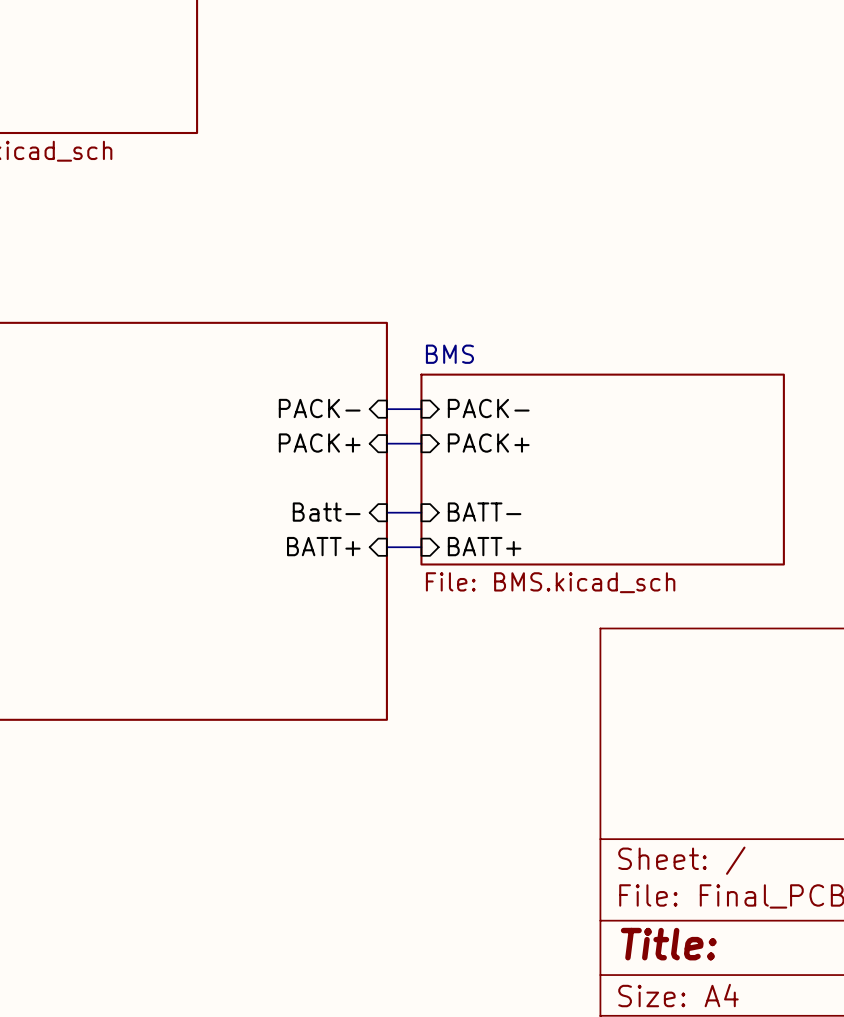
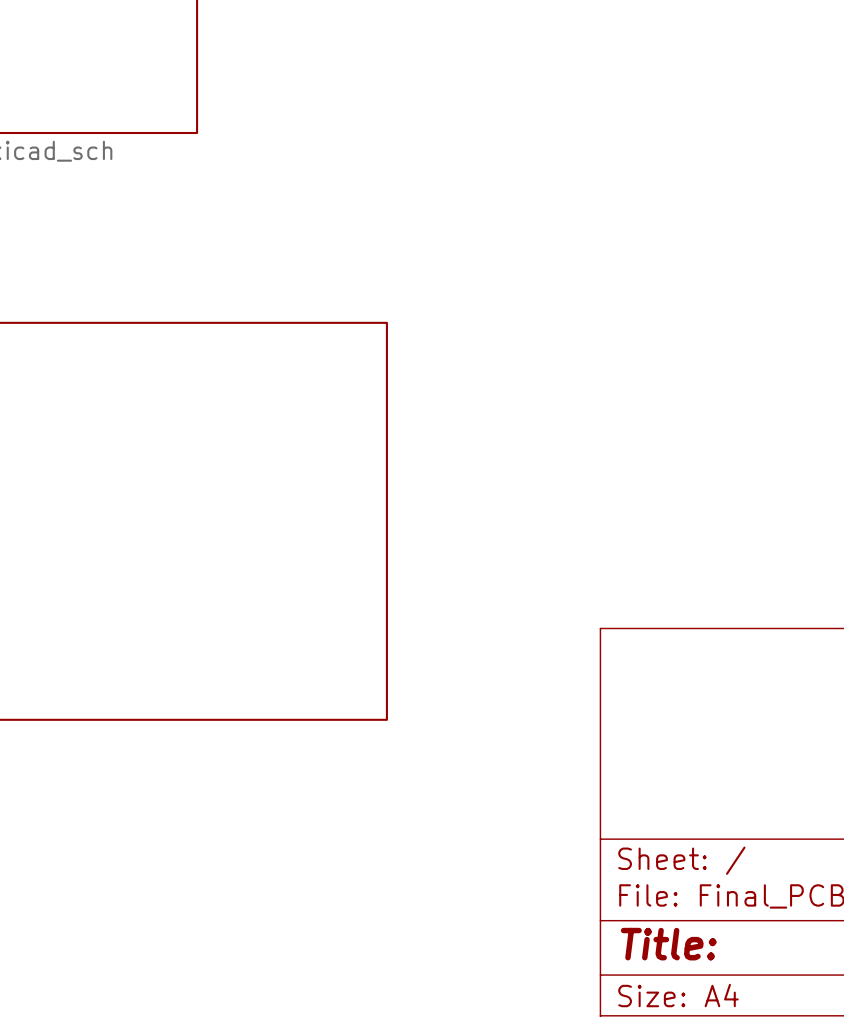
sheet pin: PACK- (319, 408) -> none
sheet pin: PACK- (488, 408) -> none
wire: (386, 409) (421, 409) -> none
sheet pin: PACK+ (319, 443) -> none
wire: (386, 443) (421, 443) -> none
sheet pin: PACK+ (488, 443) -> none
sheet BMS: File: BMS.kicad_sch (602, 469) -> none
sheet pin: Batt- (326, 512) -> none
wire: (386, 512) (421, 512) -> none
sheet pin: BATT- (484, 512) -> none
sheet pin: BATT+ (323, 546) -> none
sheet pin: BATT+ (484, 546) -> none
wire: (386, 547) (421, 547) -> none

